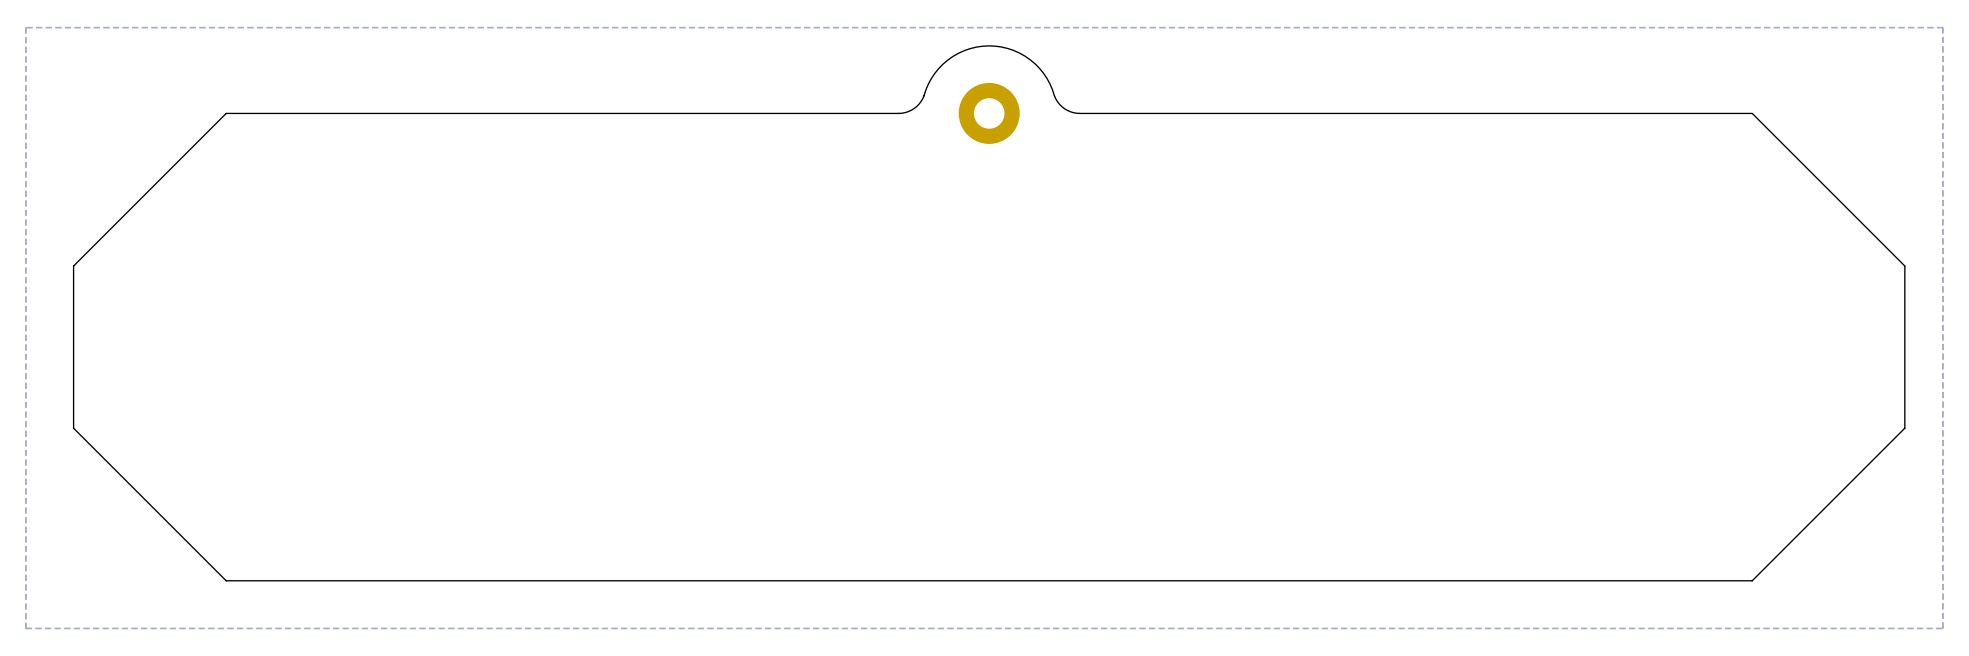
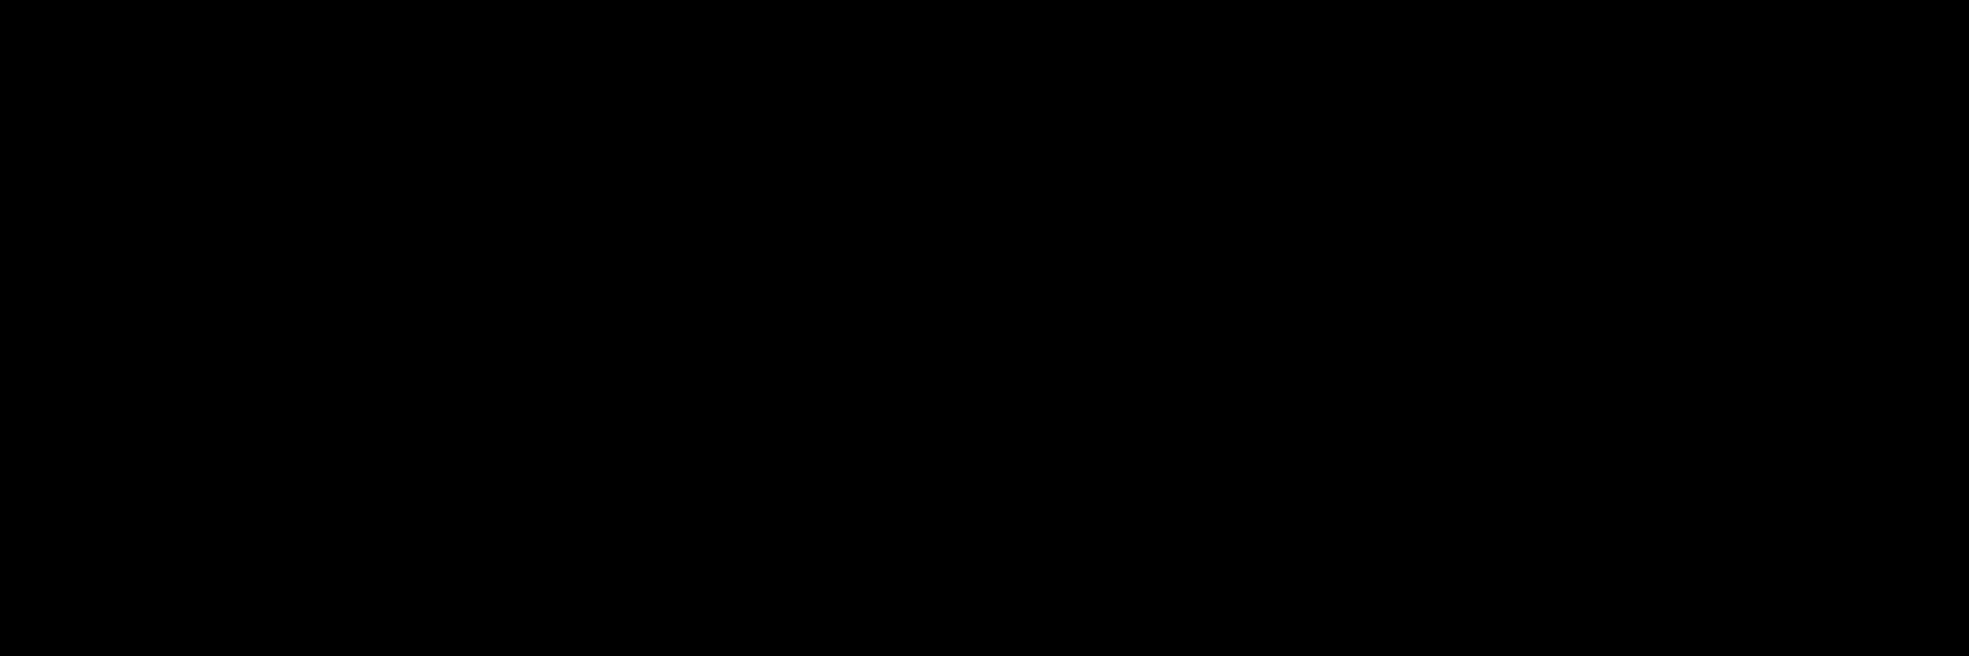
bottom zone outline: (1942, 27) (25, 27) (25, 628) (1942, 628) (1942, 27) -> none
board edge: (1054, 95) (1064, 108) (1079, 113) (1752, 113) (1904, 266) (1904, 428) (1752, 580) (226, 580) (73, 428) (73, 266) (226, 113) (901, 113) (911, 110) (918, 104) (931, 78) (948, 59) (964, 50) (989, 45) (1013, 50) (1030, 59) (1047, 78) (1054, 95) -> none
part: (989, 113) -> none

